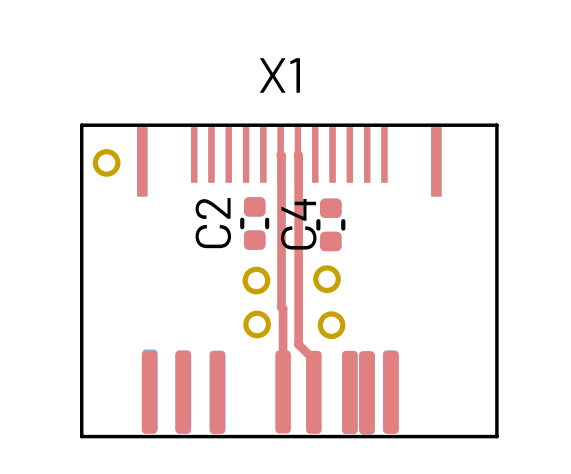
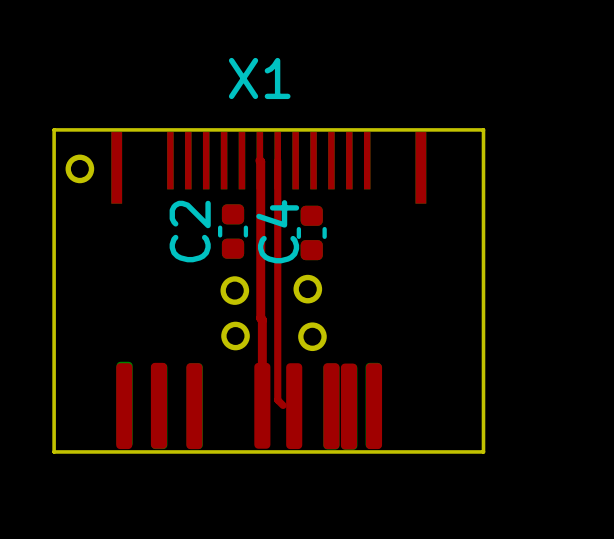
top track: (297, 154) (298, 344) (313, 359) (313, 392) -> (277, 160) (277, 400) (283, 405)

